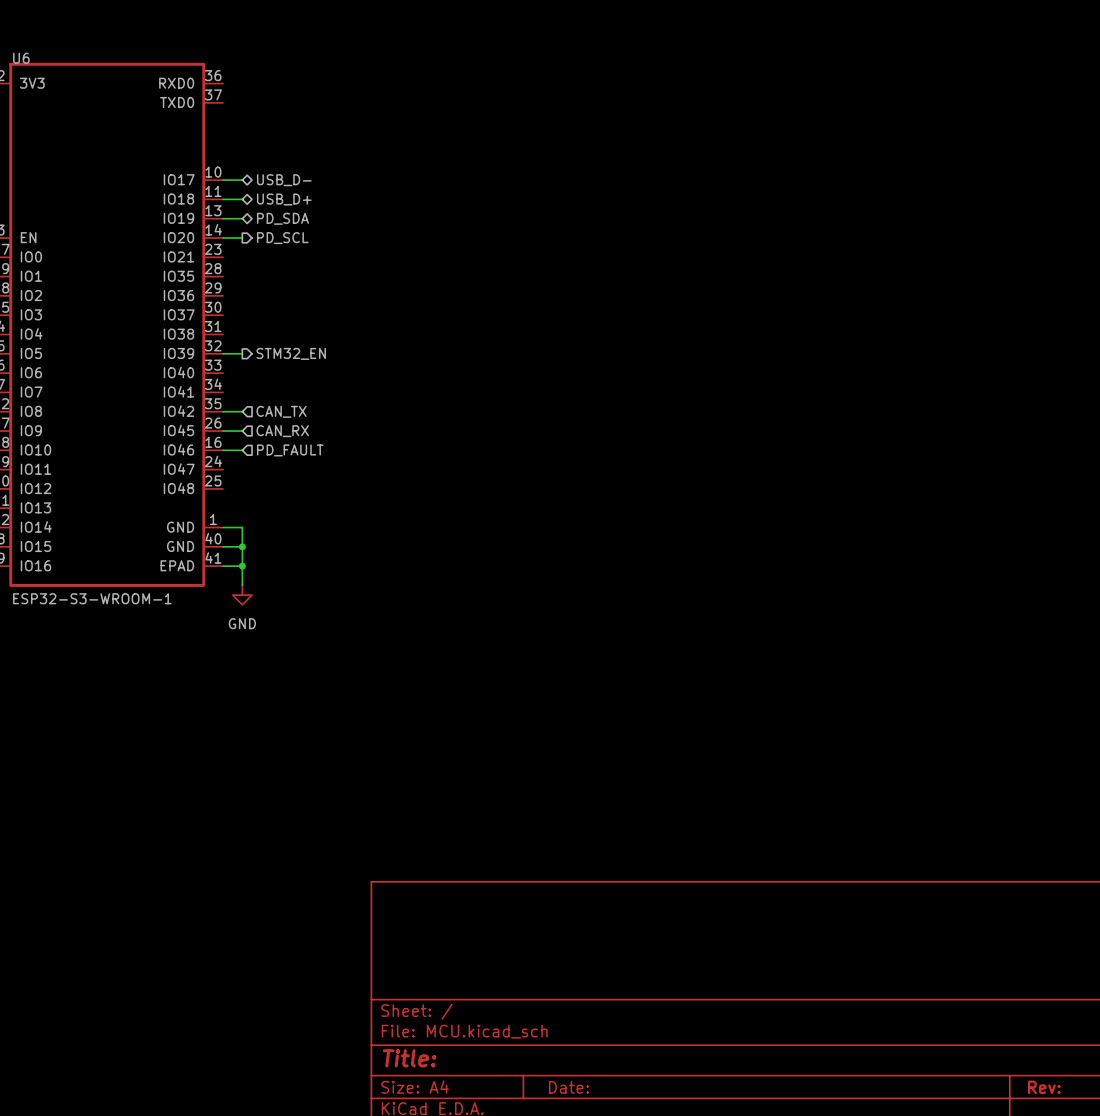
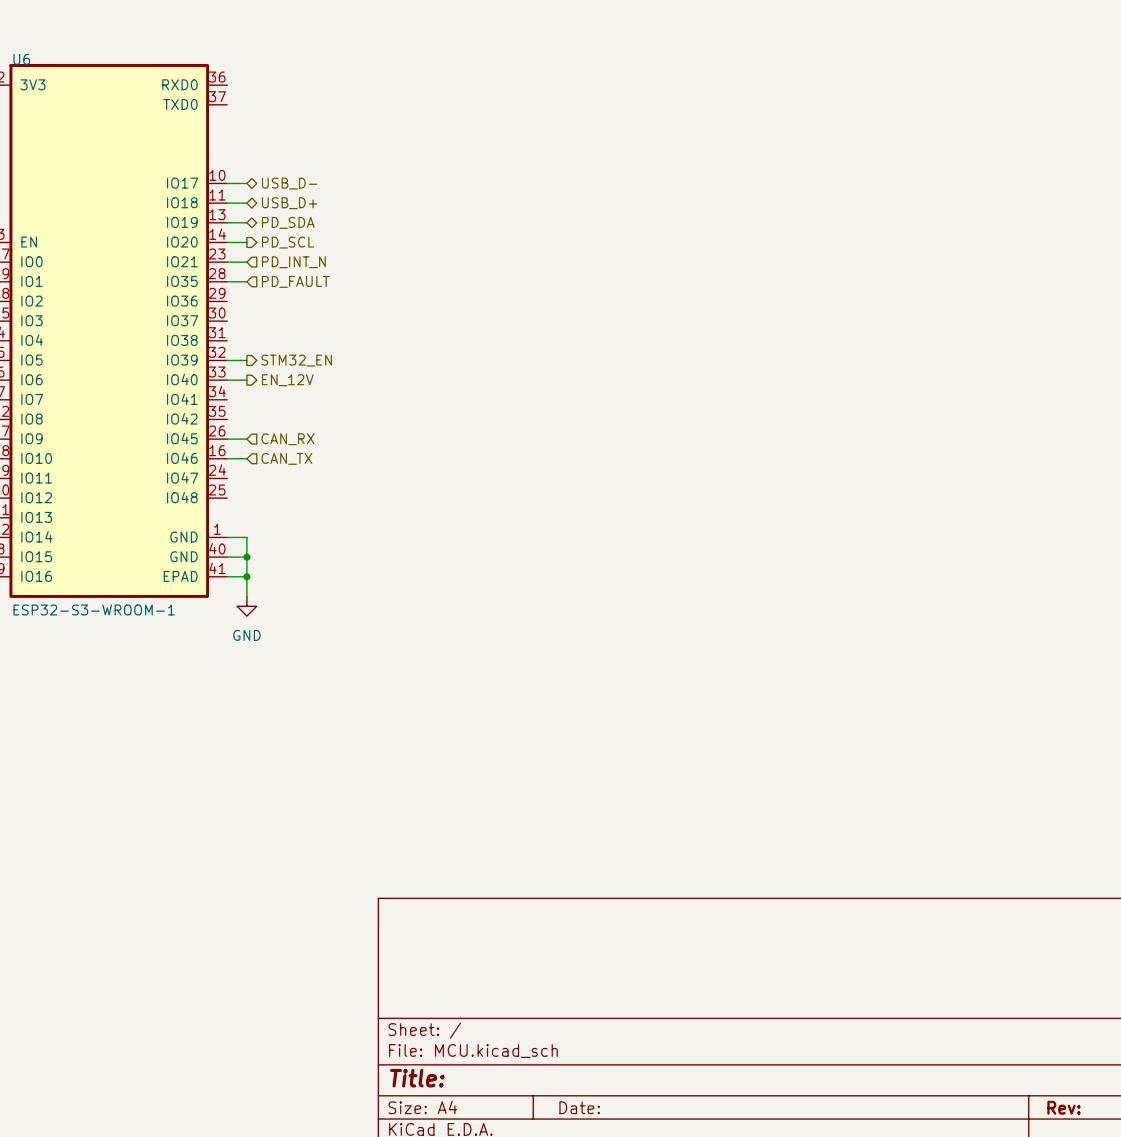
wire: none -> (227, 262) (246, 262)
hierarchical label: none -> PD_INT_N (293, 262)
wire: none -> (227, 281) (246, 281)
hierarchical label: none -> PD_FAULT (295, 281)
hierarchical label: none -> EN_12V (287, 380)
wire: (223, 411) (242, 411) -> (227, 380) (246, 380)
hierarchical label: CAN_TX (281, 411) -> none
hierarchical label: PD_FAULT (290, 450) -> CAN_TX (286, 458)

